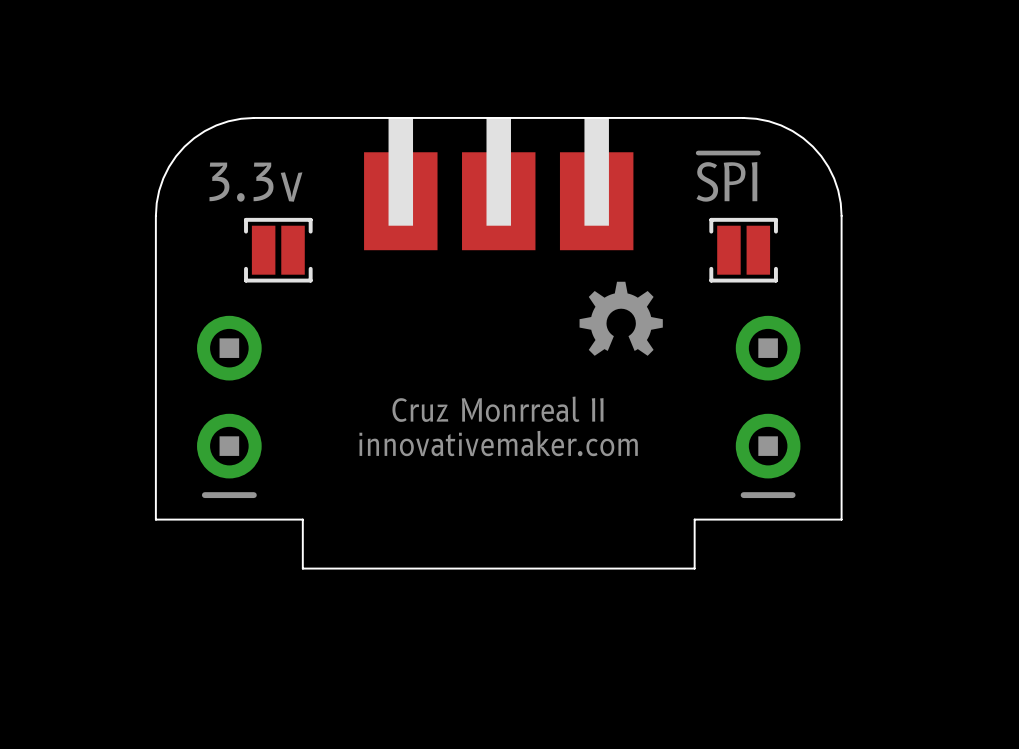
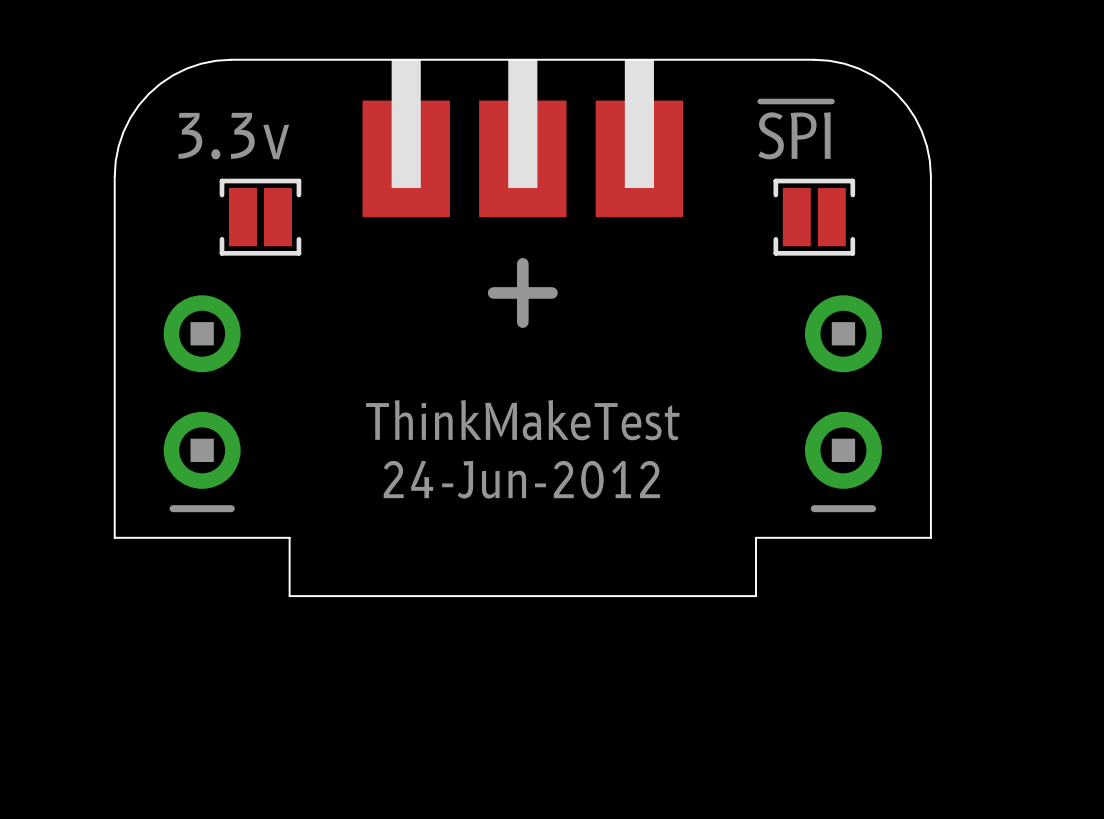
drawing: [579, 281, 663, 356] -> none
line: none -> (522, 263) (522, 322)
line: none -> (493, 292) (551, 292)
text: Cruz Monrreal II (497, 409) -> ThinkMakeTest (522, 420)
text: innovativemaker.com (498, 443) -> 24-Jun-2012 (521, 479)

